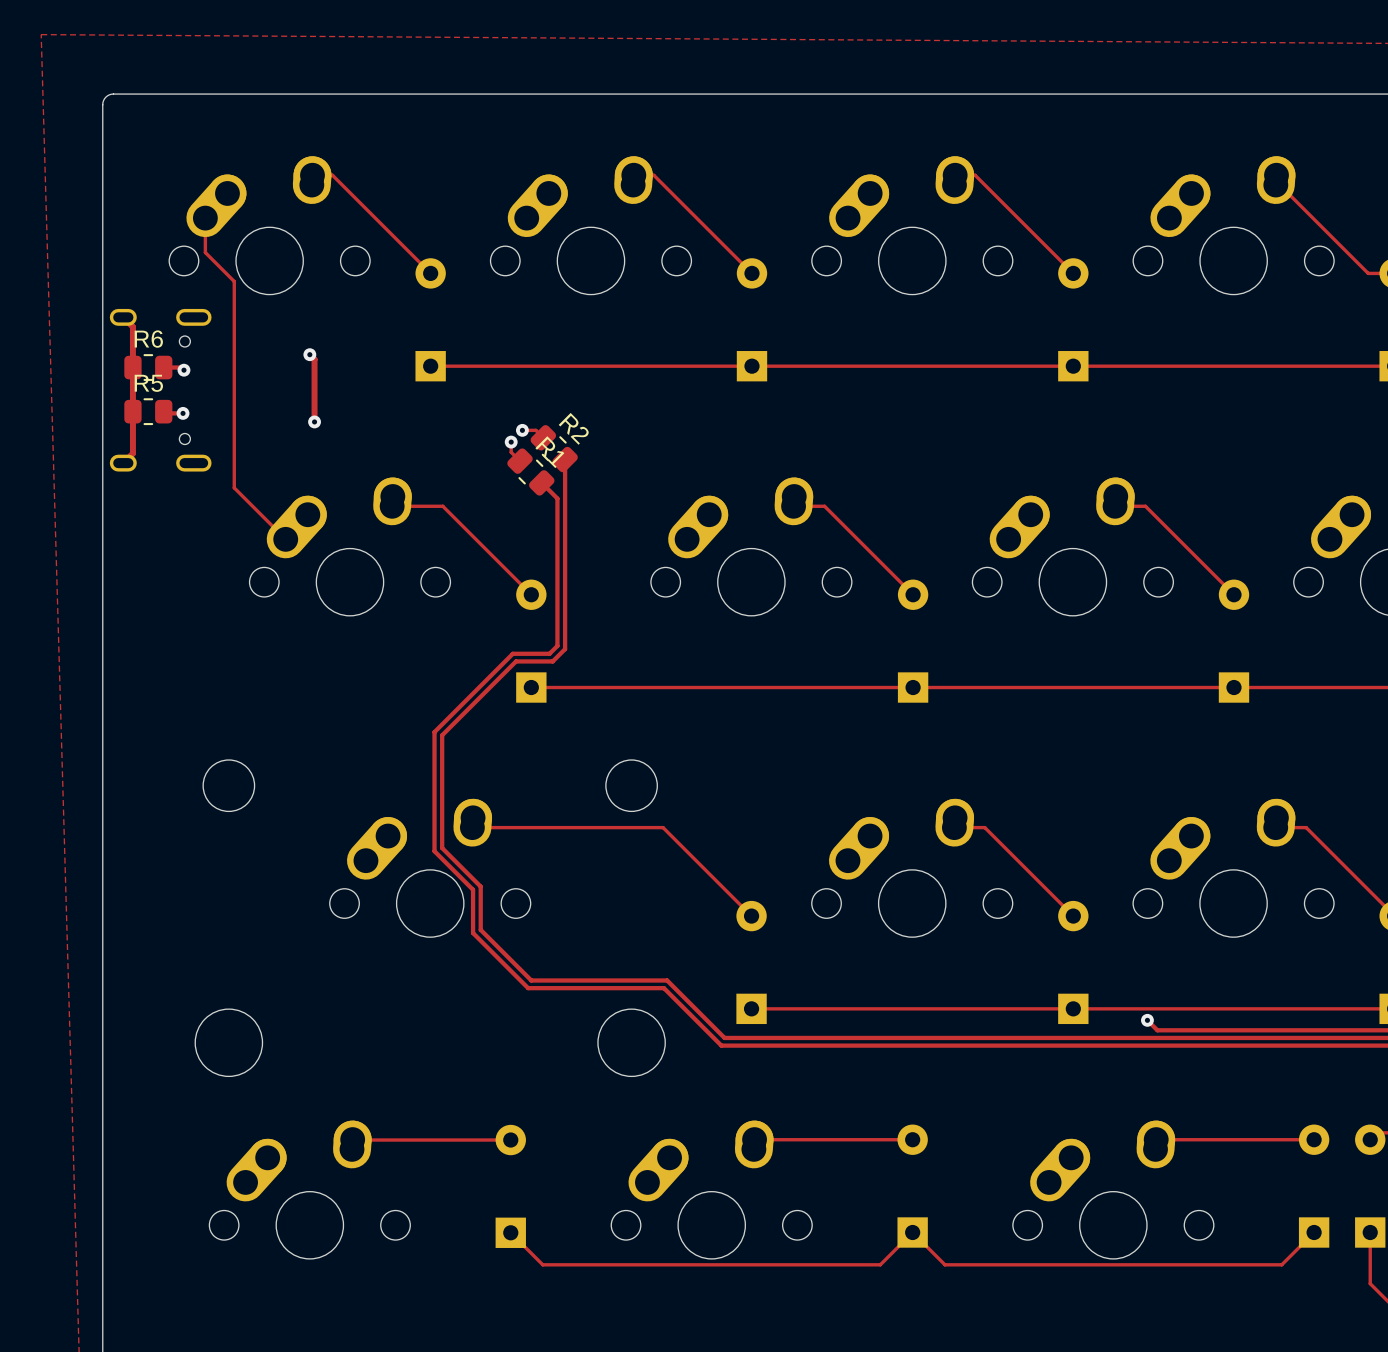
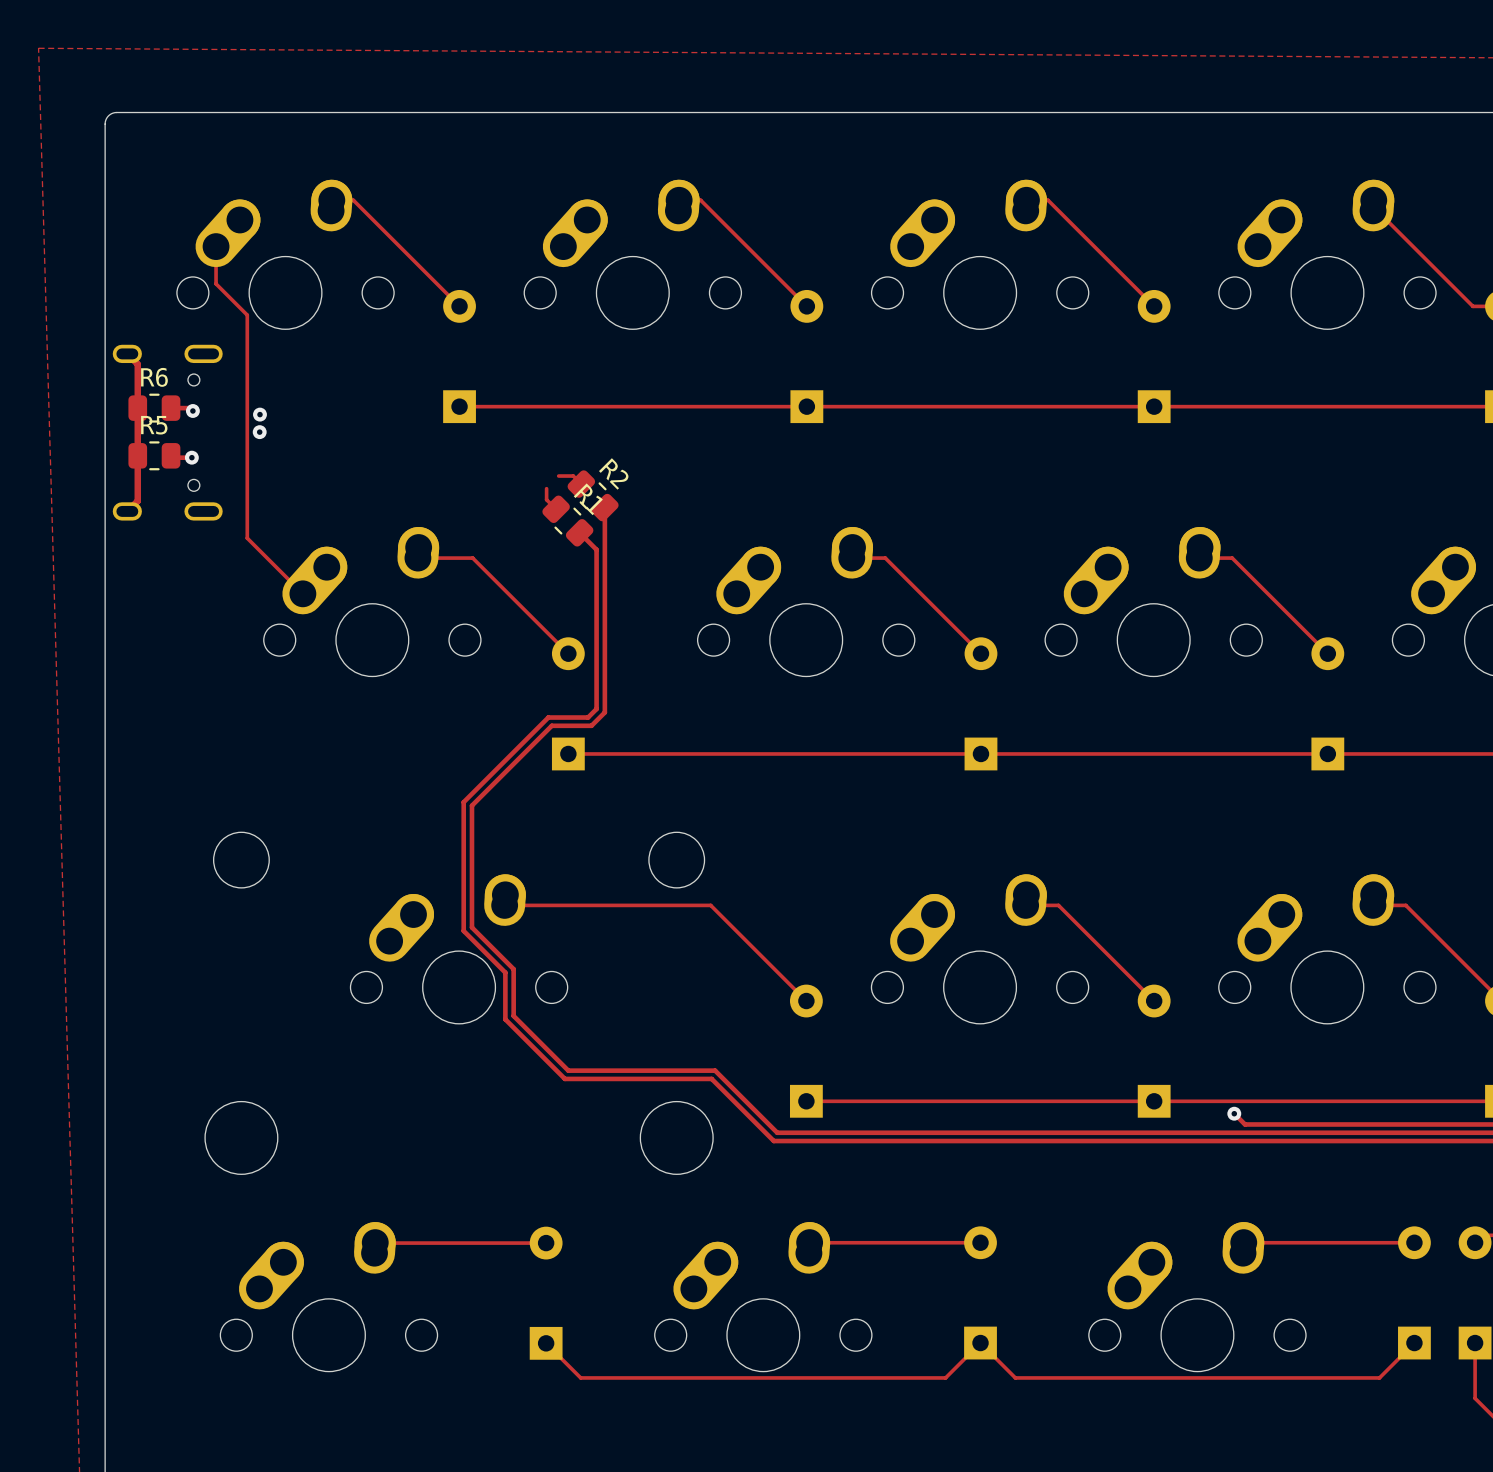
track: (309, 354) (314, 359) (314, 421) -> none
via: (309, 354) -> none
via: none -> (259, 414)
via: none -> (259, 432)
via: (314, 421) -> none
via: (522, 430) -> none
via: (511, 442) -> none

